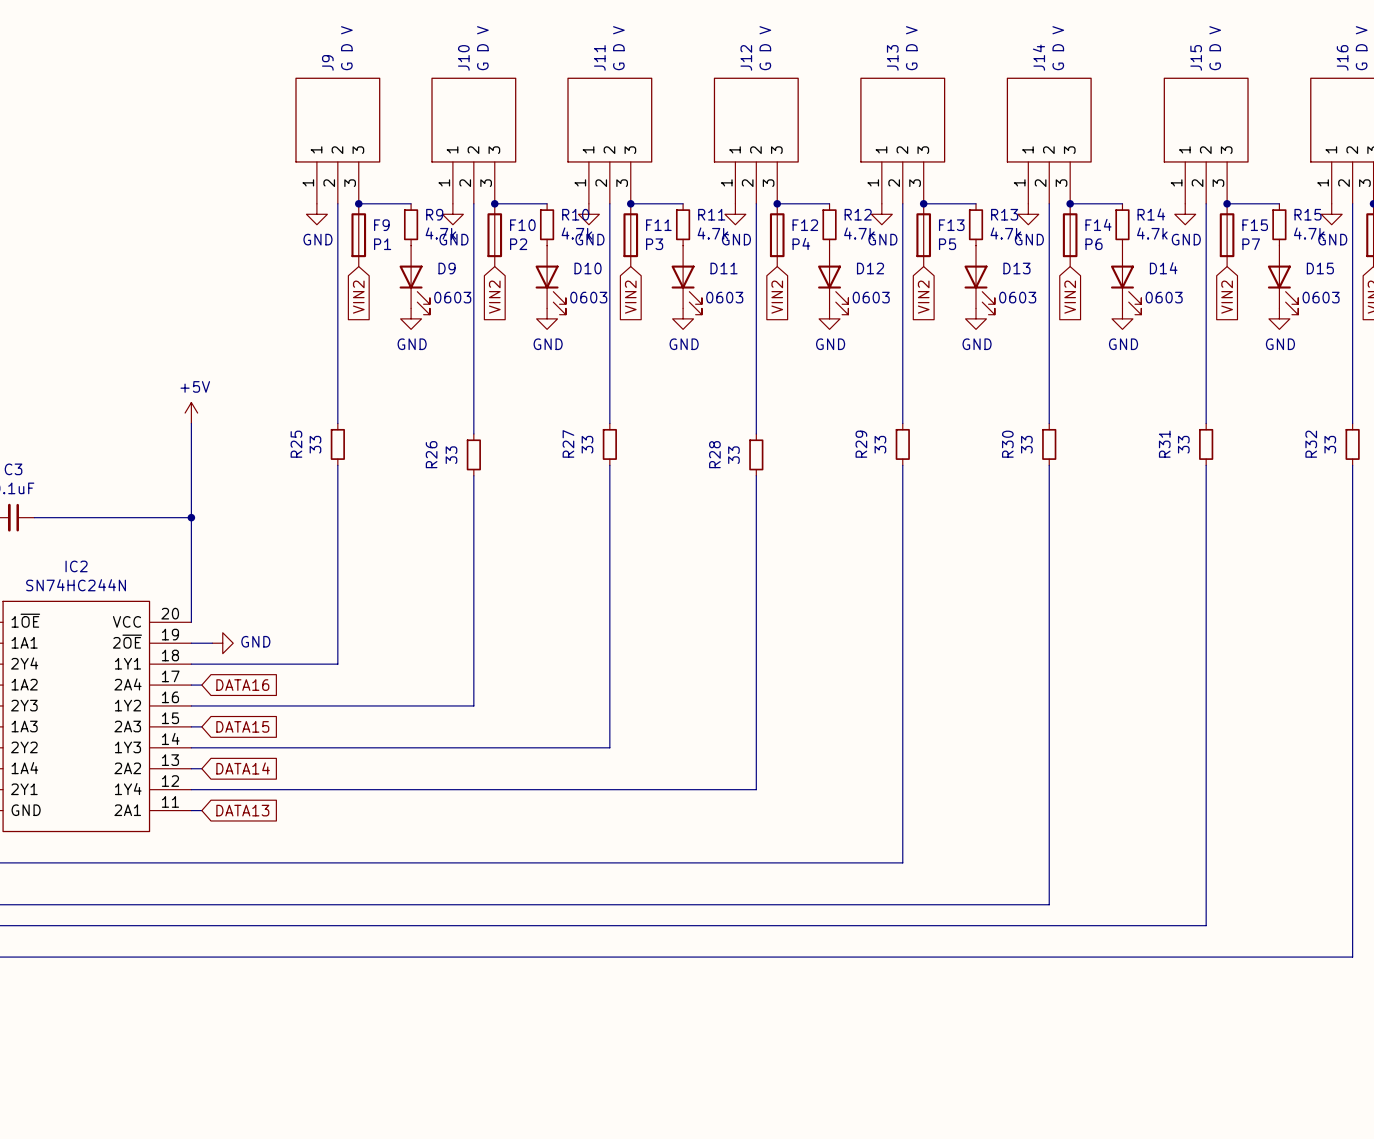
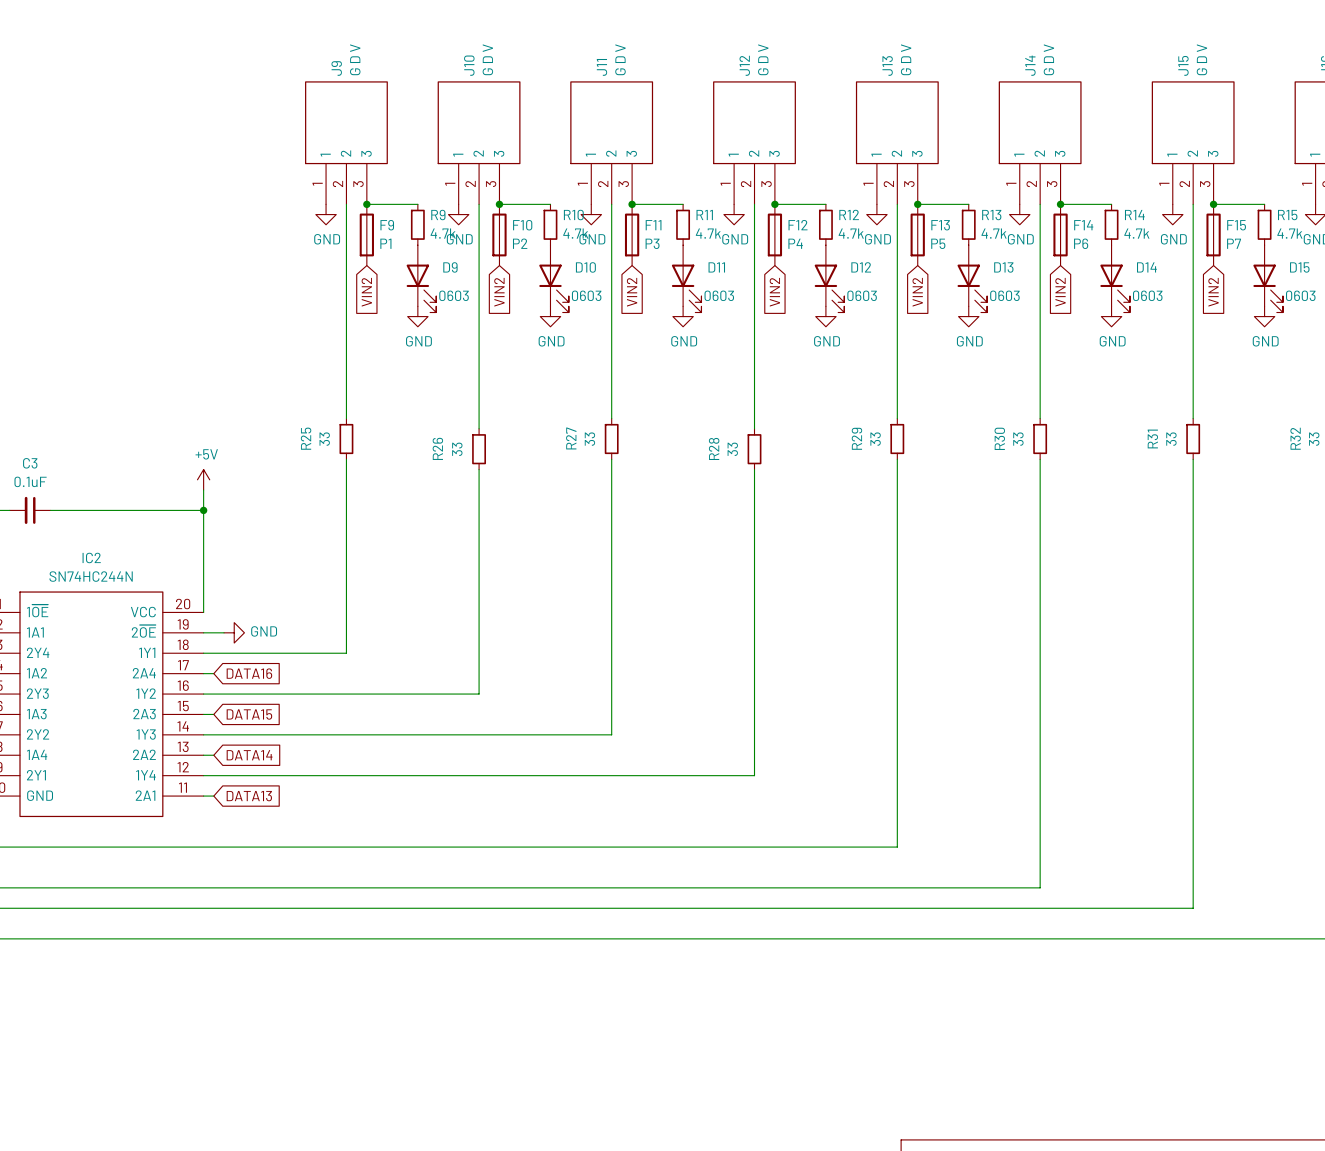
power symbol position: +5V (191, 413) -> +5V (203, 479)
wire: (191, 423) (191, 496) -> none

